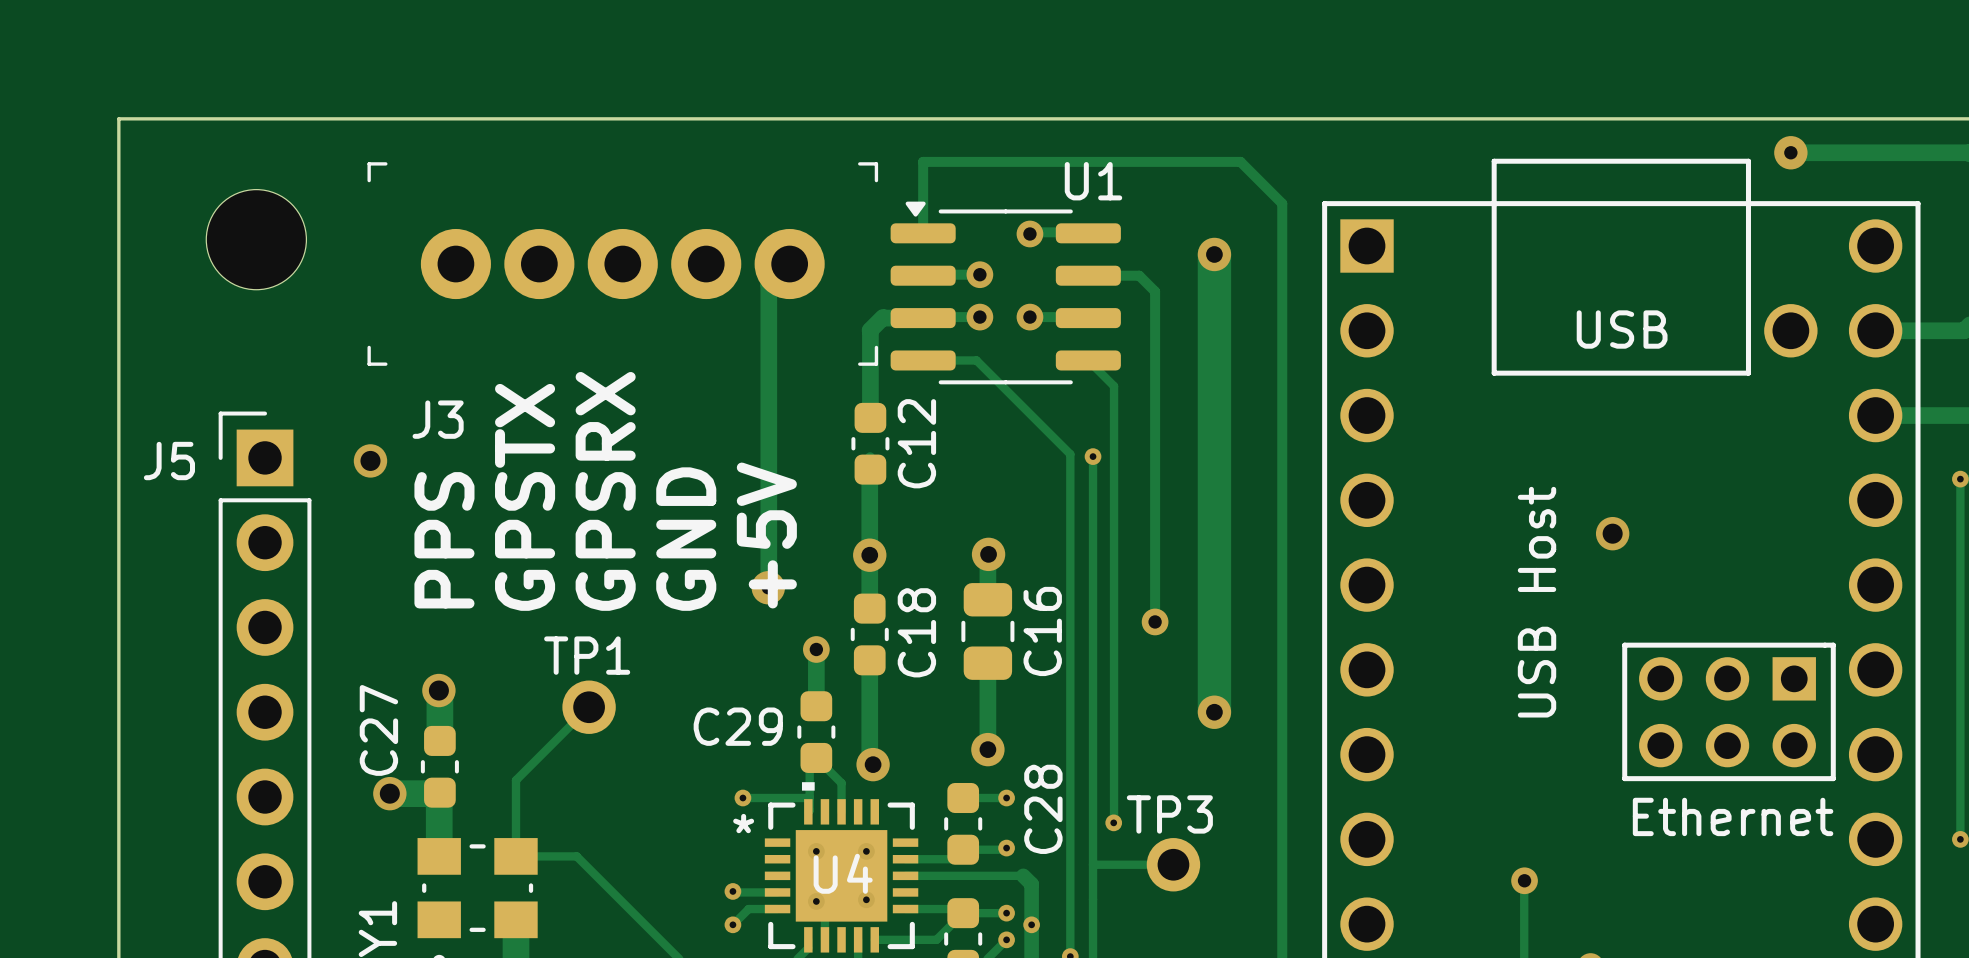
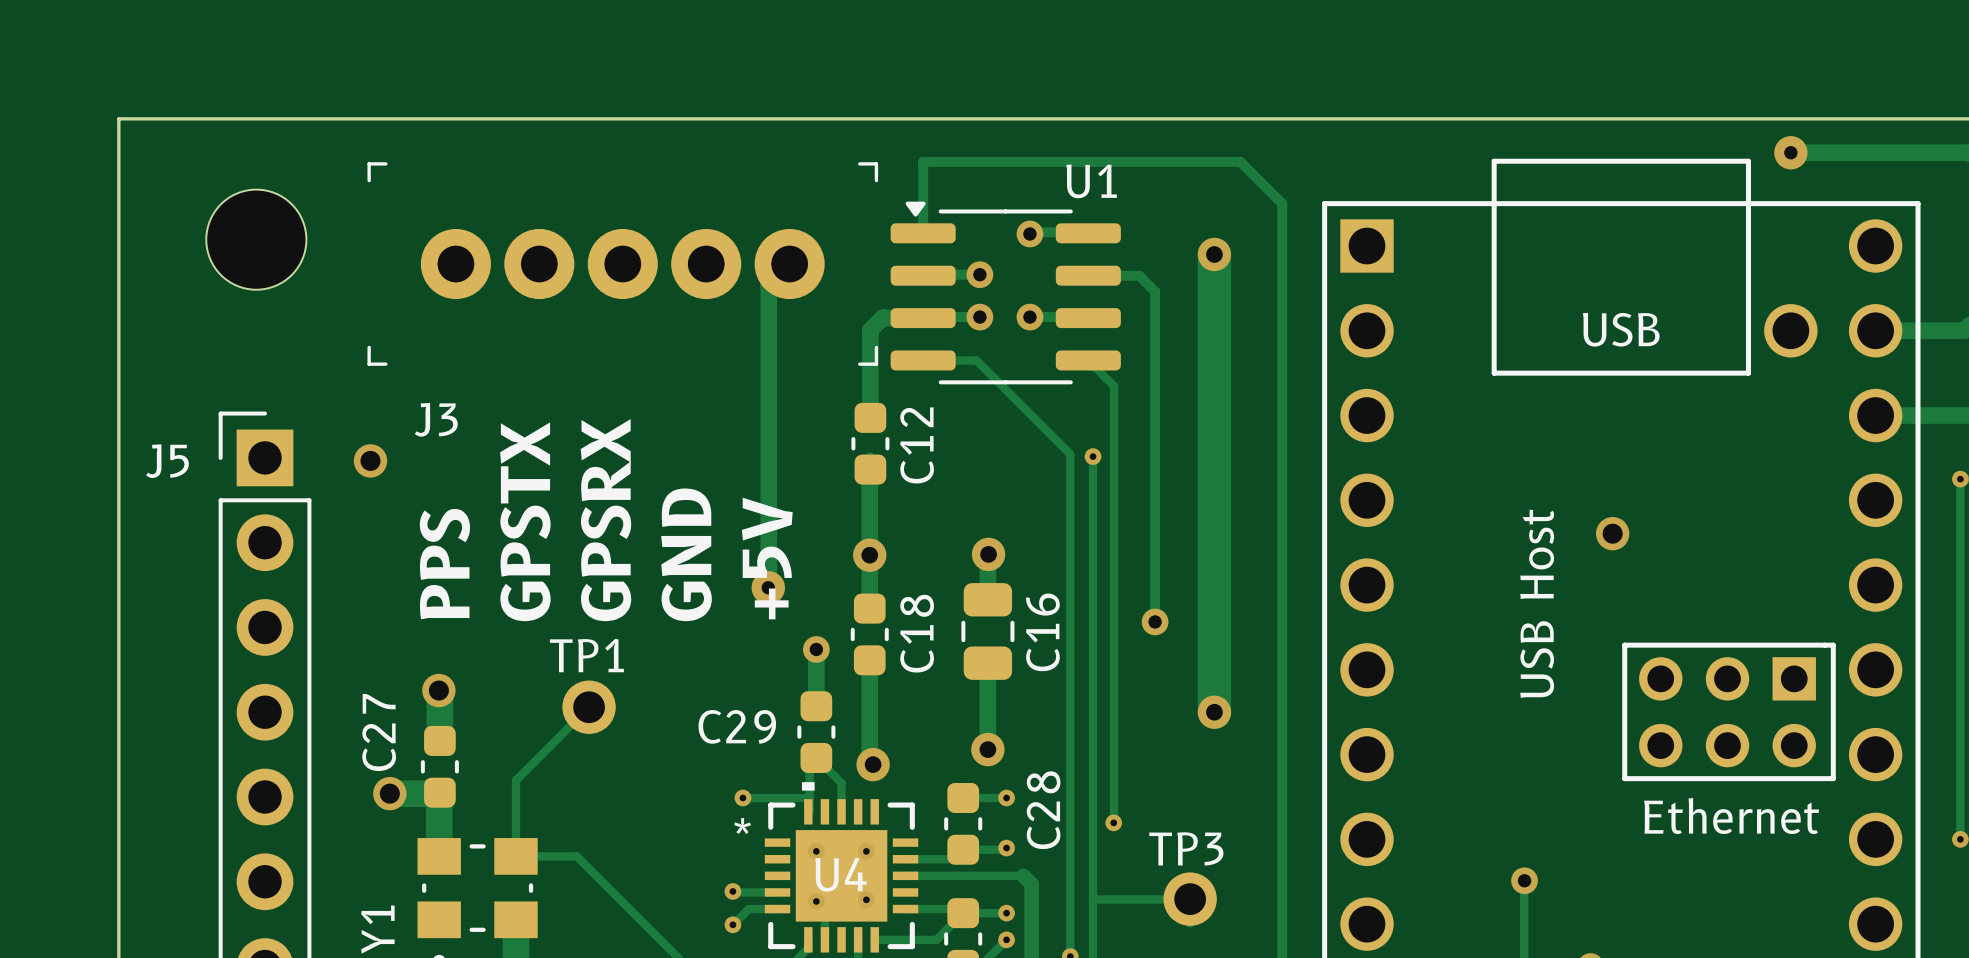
track: (1093, 864) (1173, 864) -> none
TP3 position: (1173, 864) -> (1190, 899)
track: none -> (1093, 899) (1166, 899) (1190, 923)
via: (1031, 924) -> none

